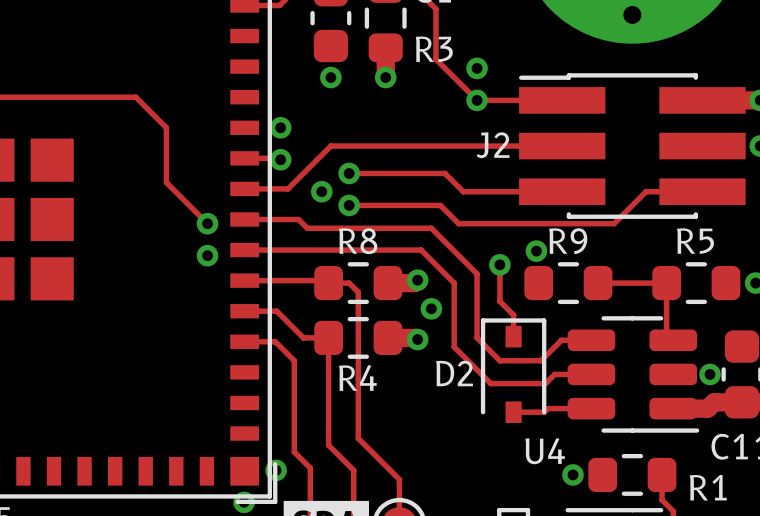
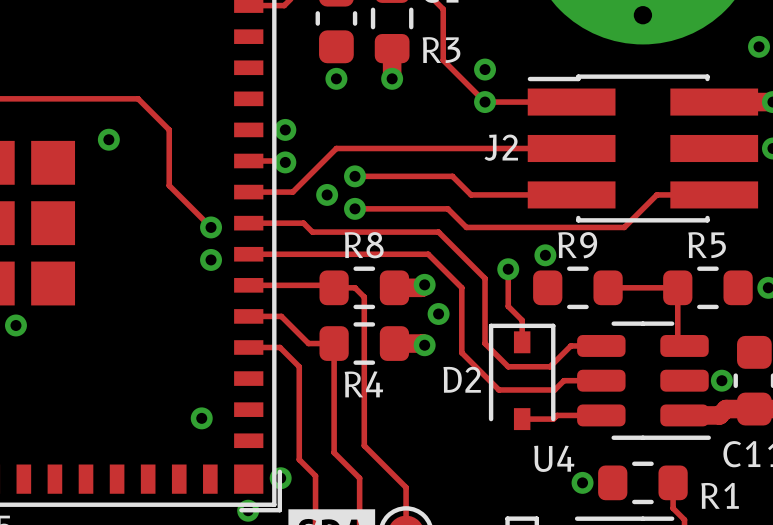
via: none -> (759, 46)
via: none -> (108, 139)
via: none -> (15, 325)
via: none -> (201, 418)

